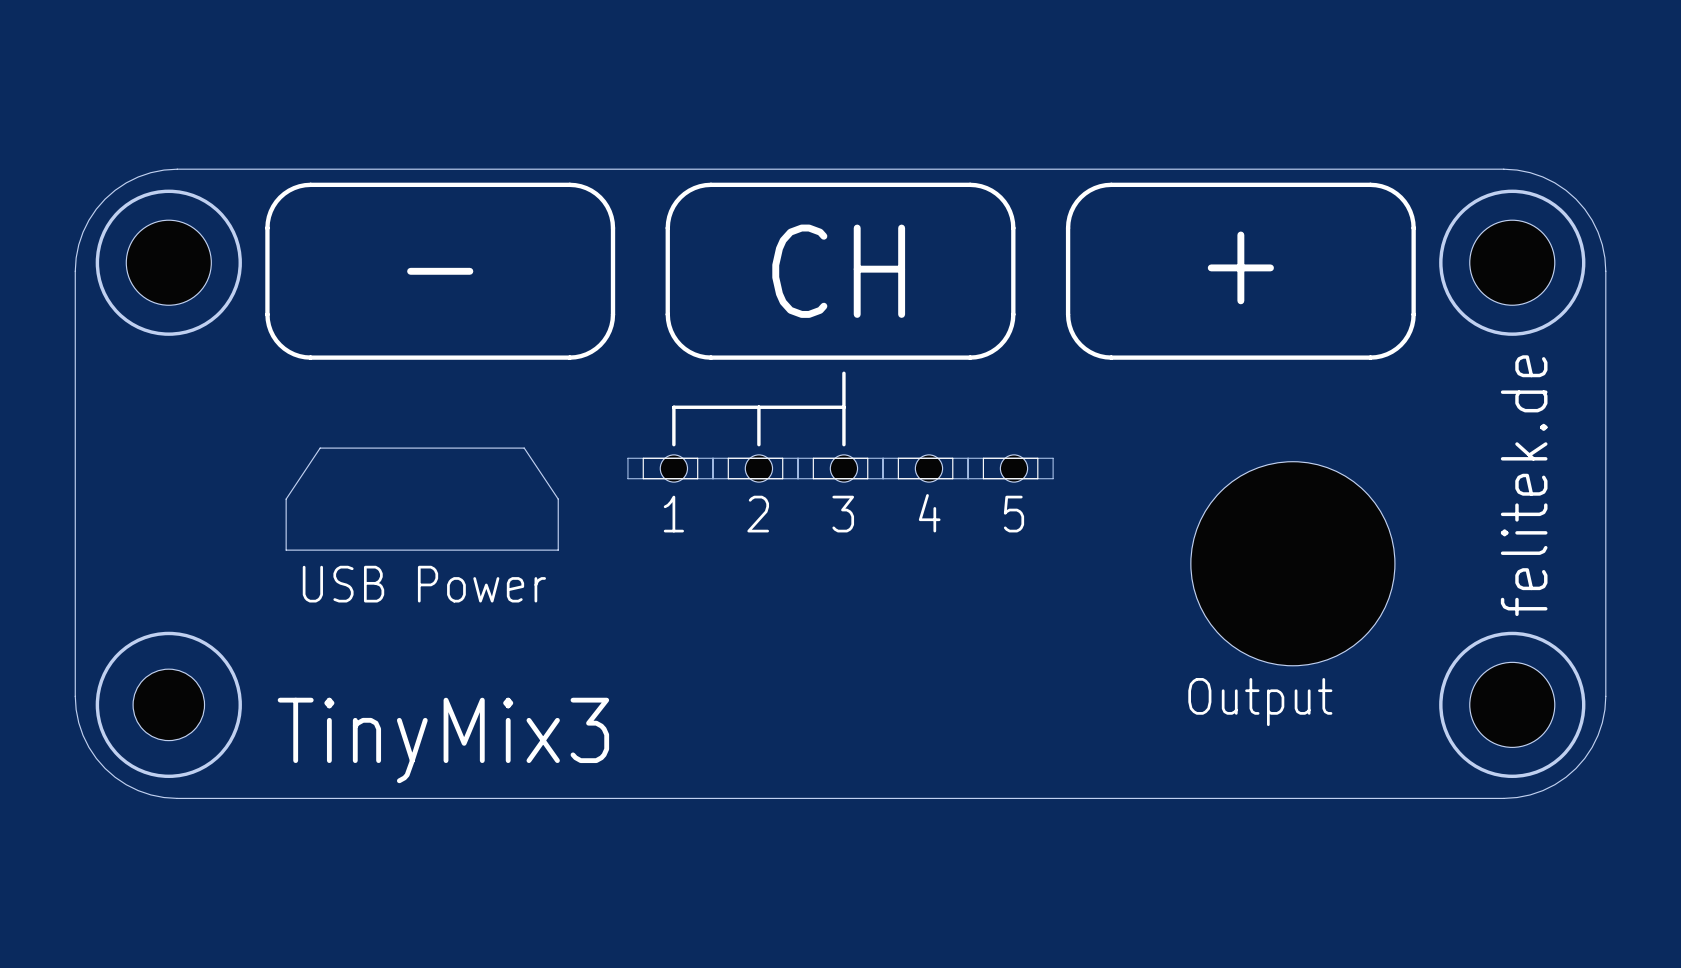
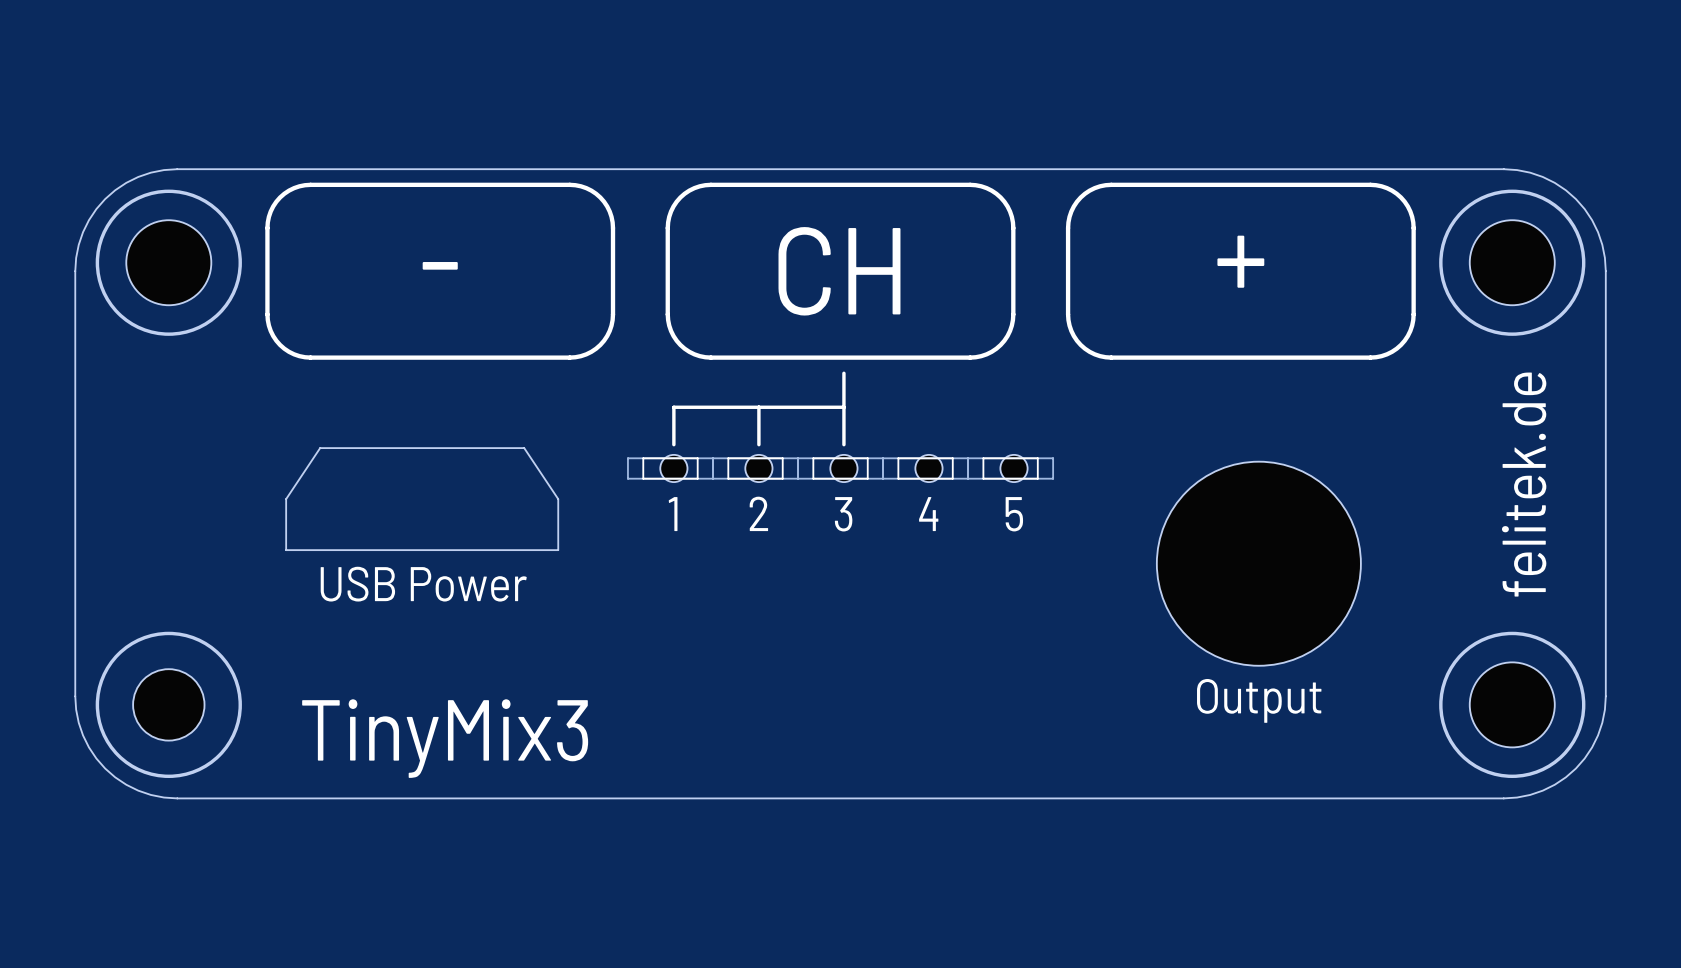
part position: (1292, 563) -> (1258, 563)

